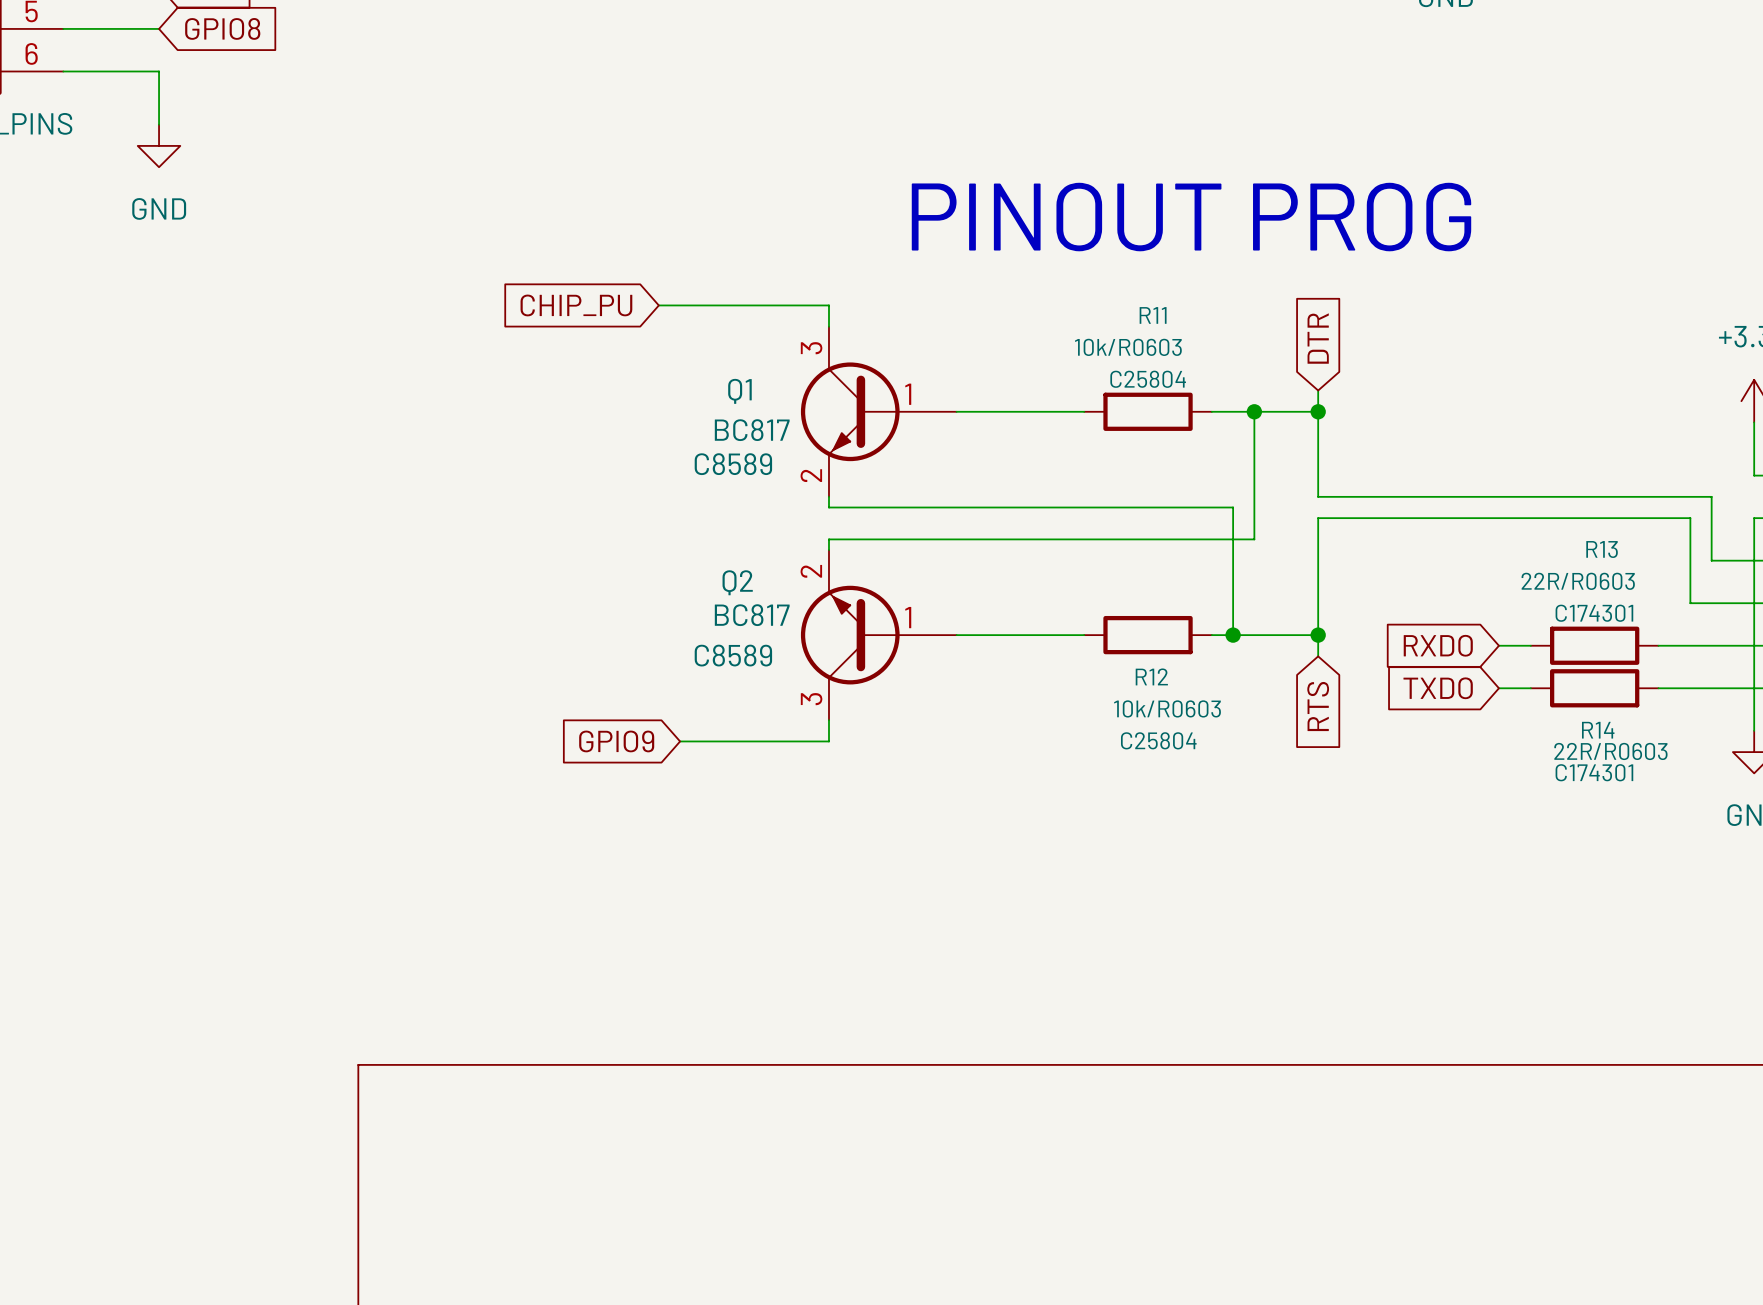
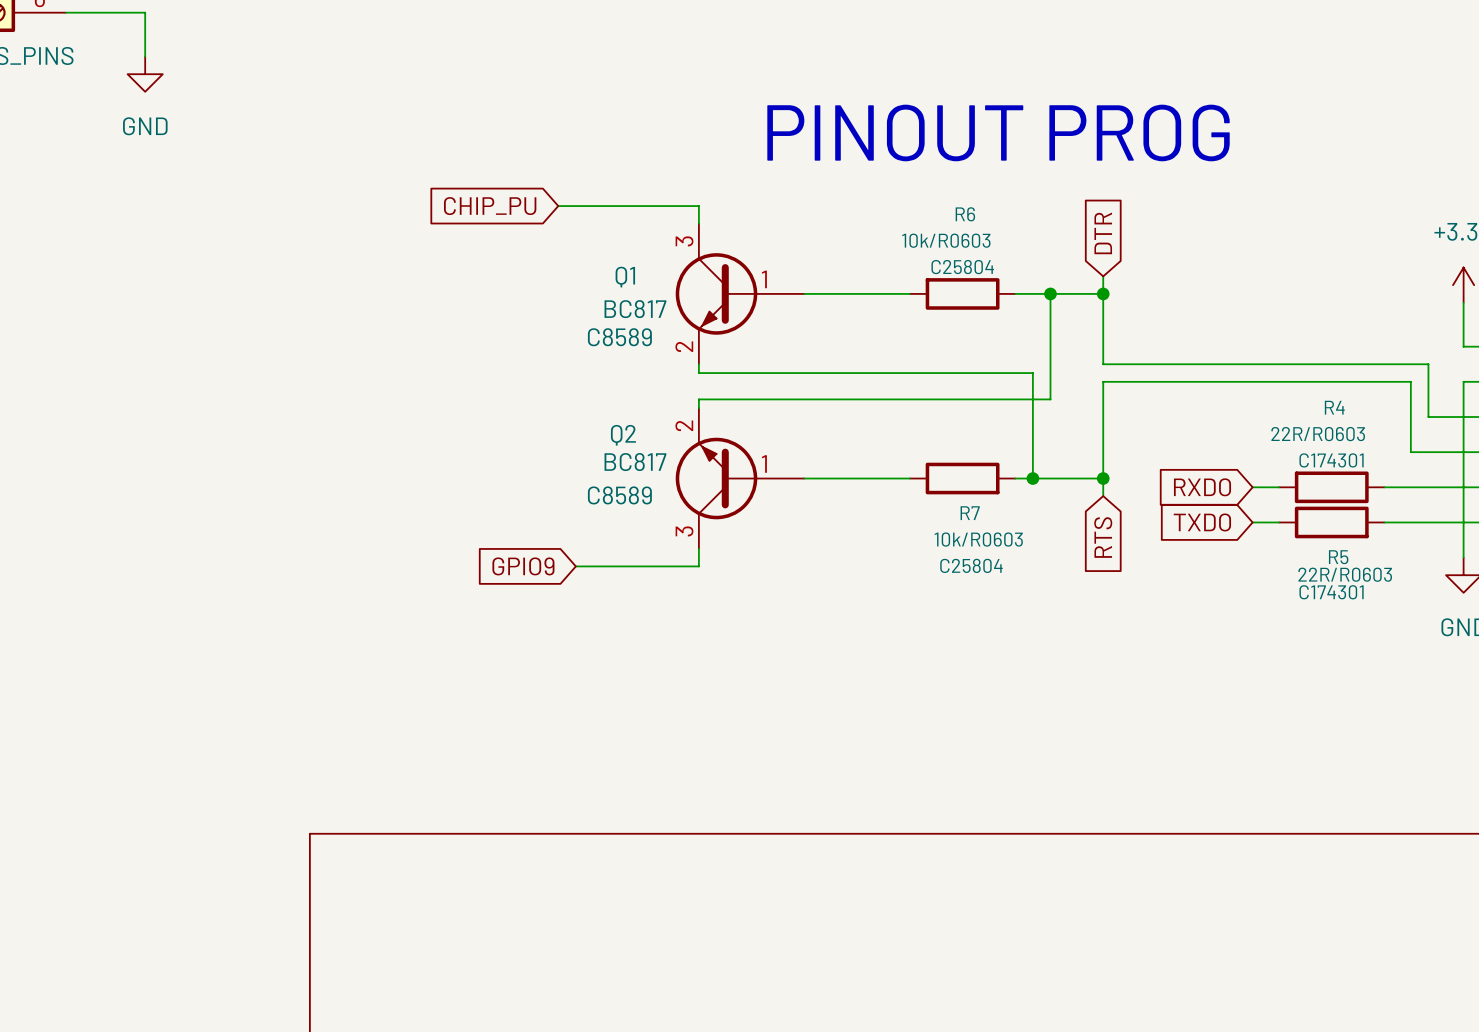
R11 name: R11 (1153, 315) -> R6 (965, 214)
R13 name: R13 (1602, 549) -> R4 (1334, 407)
R12 name: R12 (1151, 676) -> R7 (970, 513)
R14 name: R14 (1598, 730) -> R5 (1338, 557)

